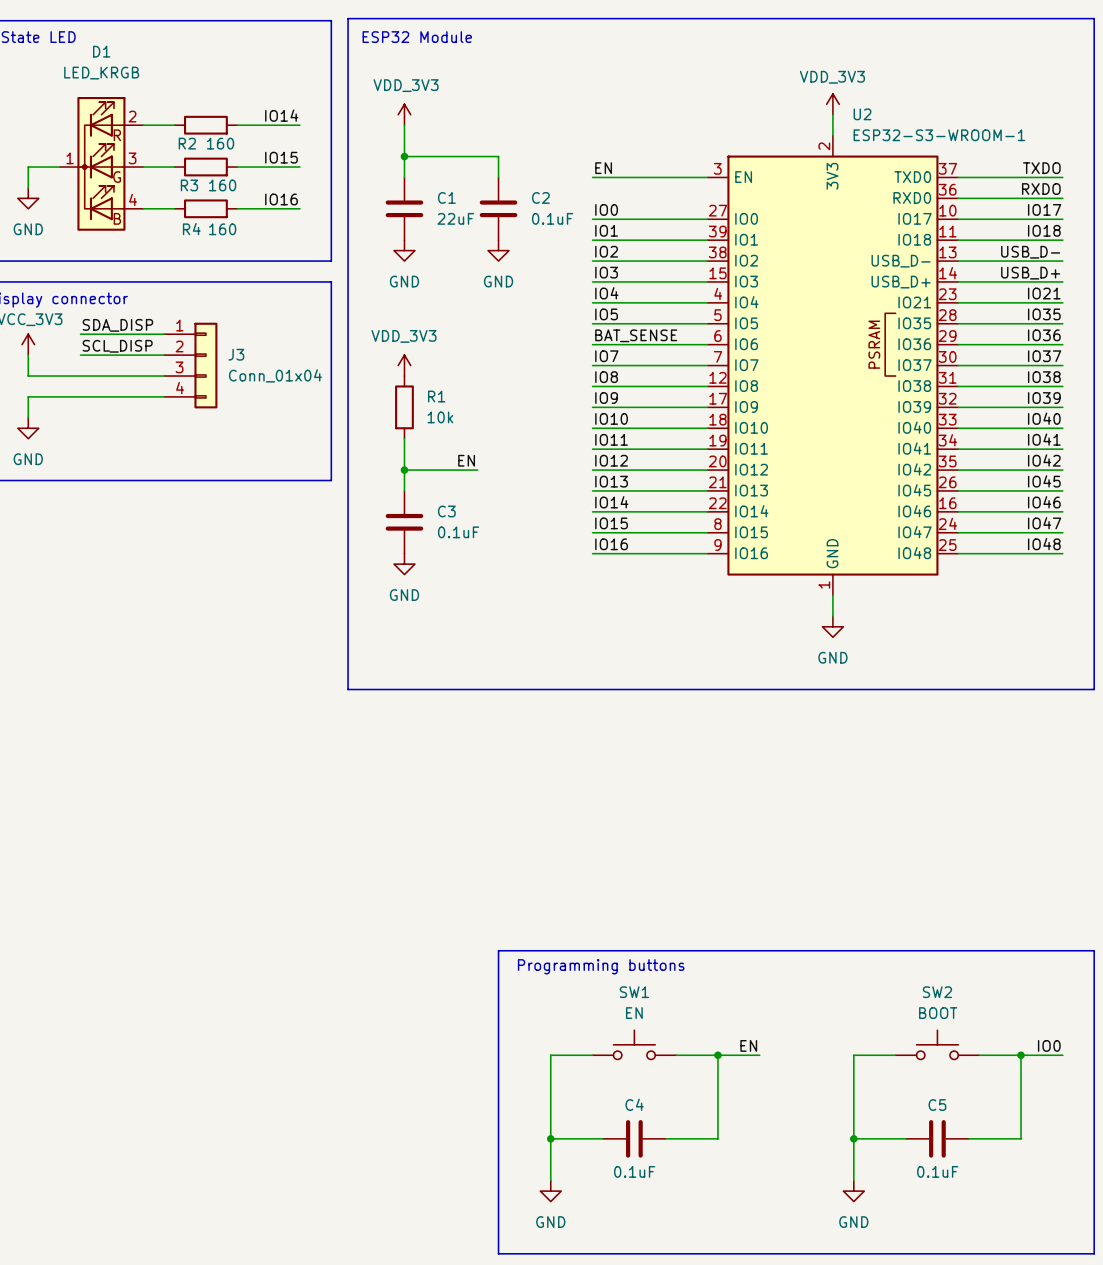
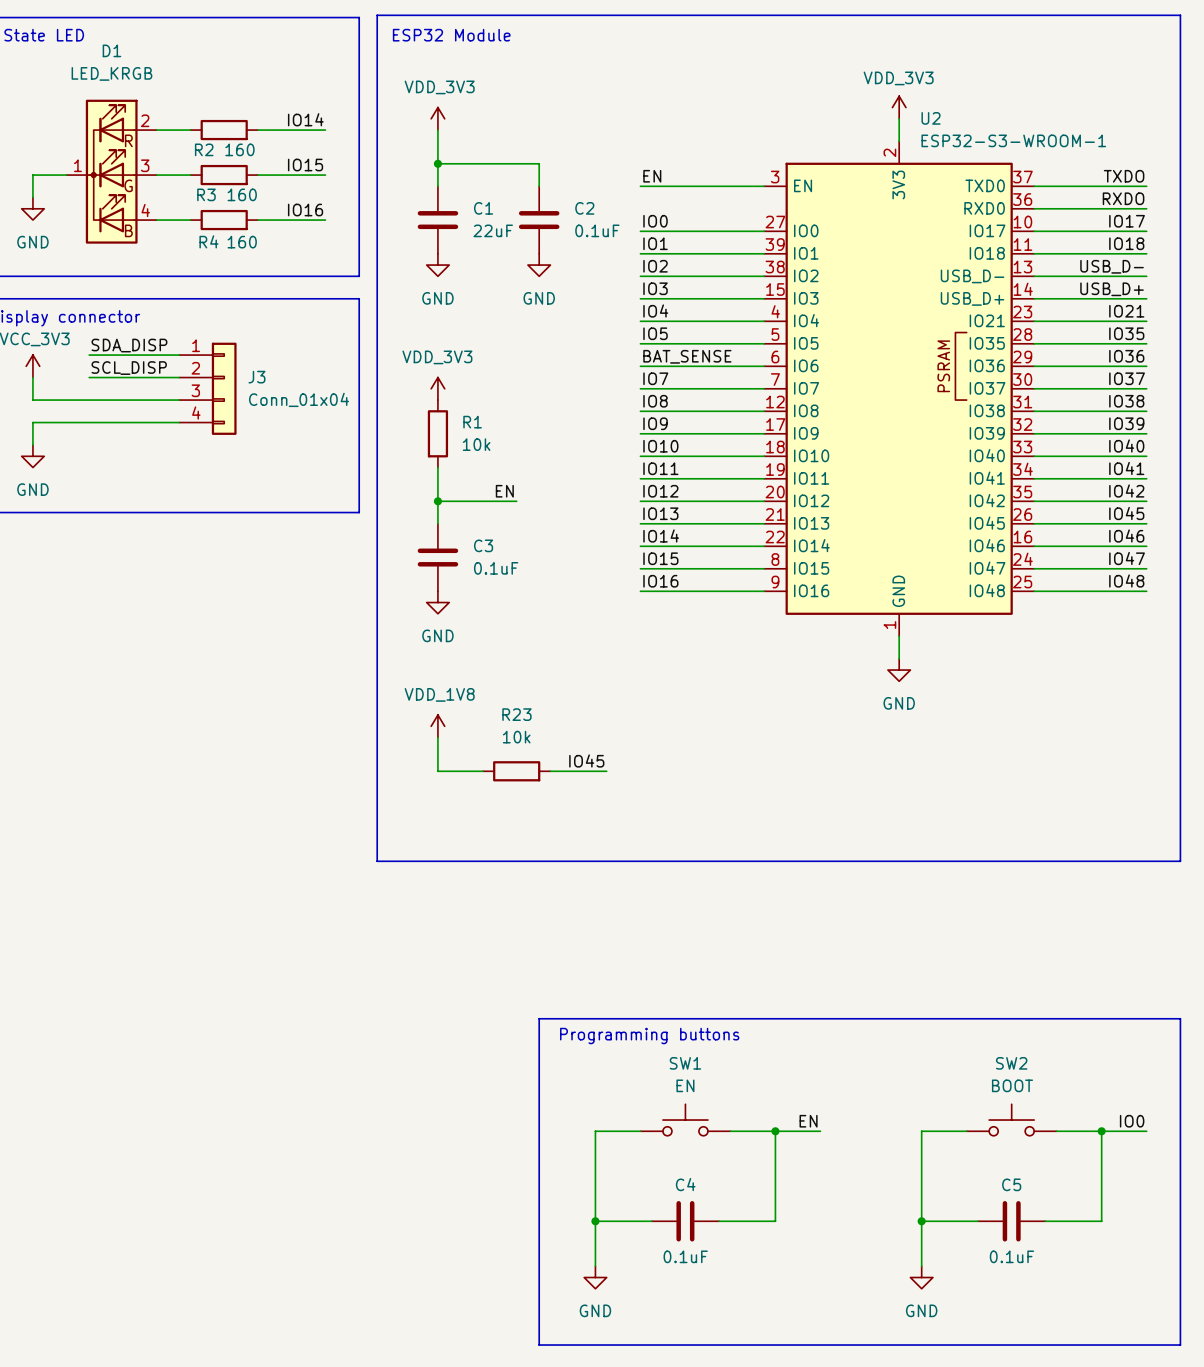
power symbol: none -> VDD_1V8 (437, 726)
line: (348, 689) (1094, 689) -> (377, 737) (377, 861) (1180, 861) (1180, 737)
wire: none -> (437, 737) (437, 771) (482, 771)
label: none -> IO45 (586, 760)
R23: none -> 10k (516, 771)
wire: none -> (550, 771) (606, 771)

